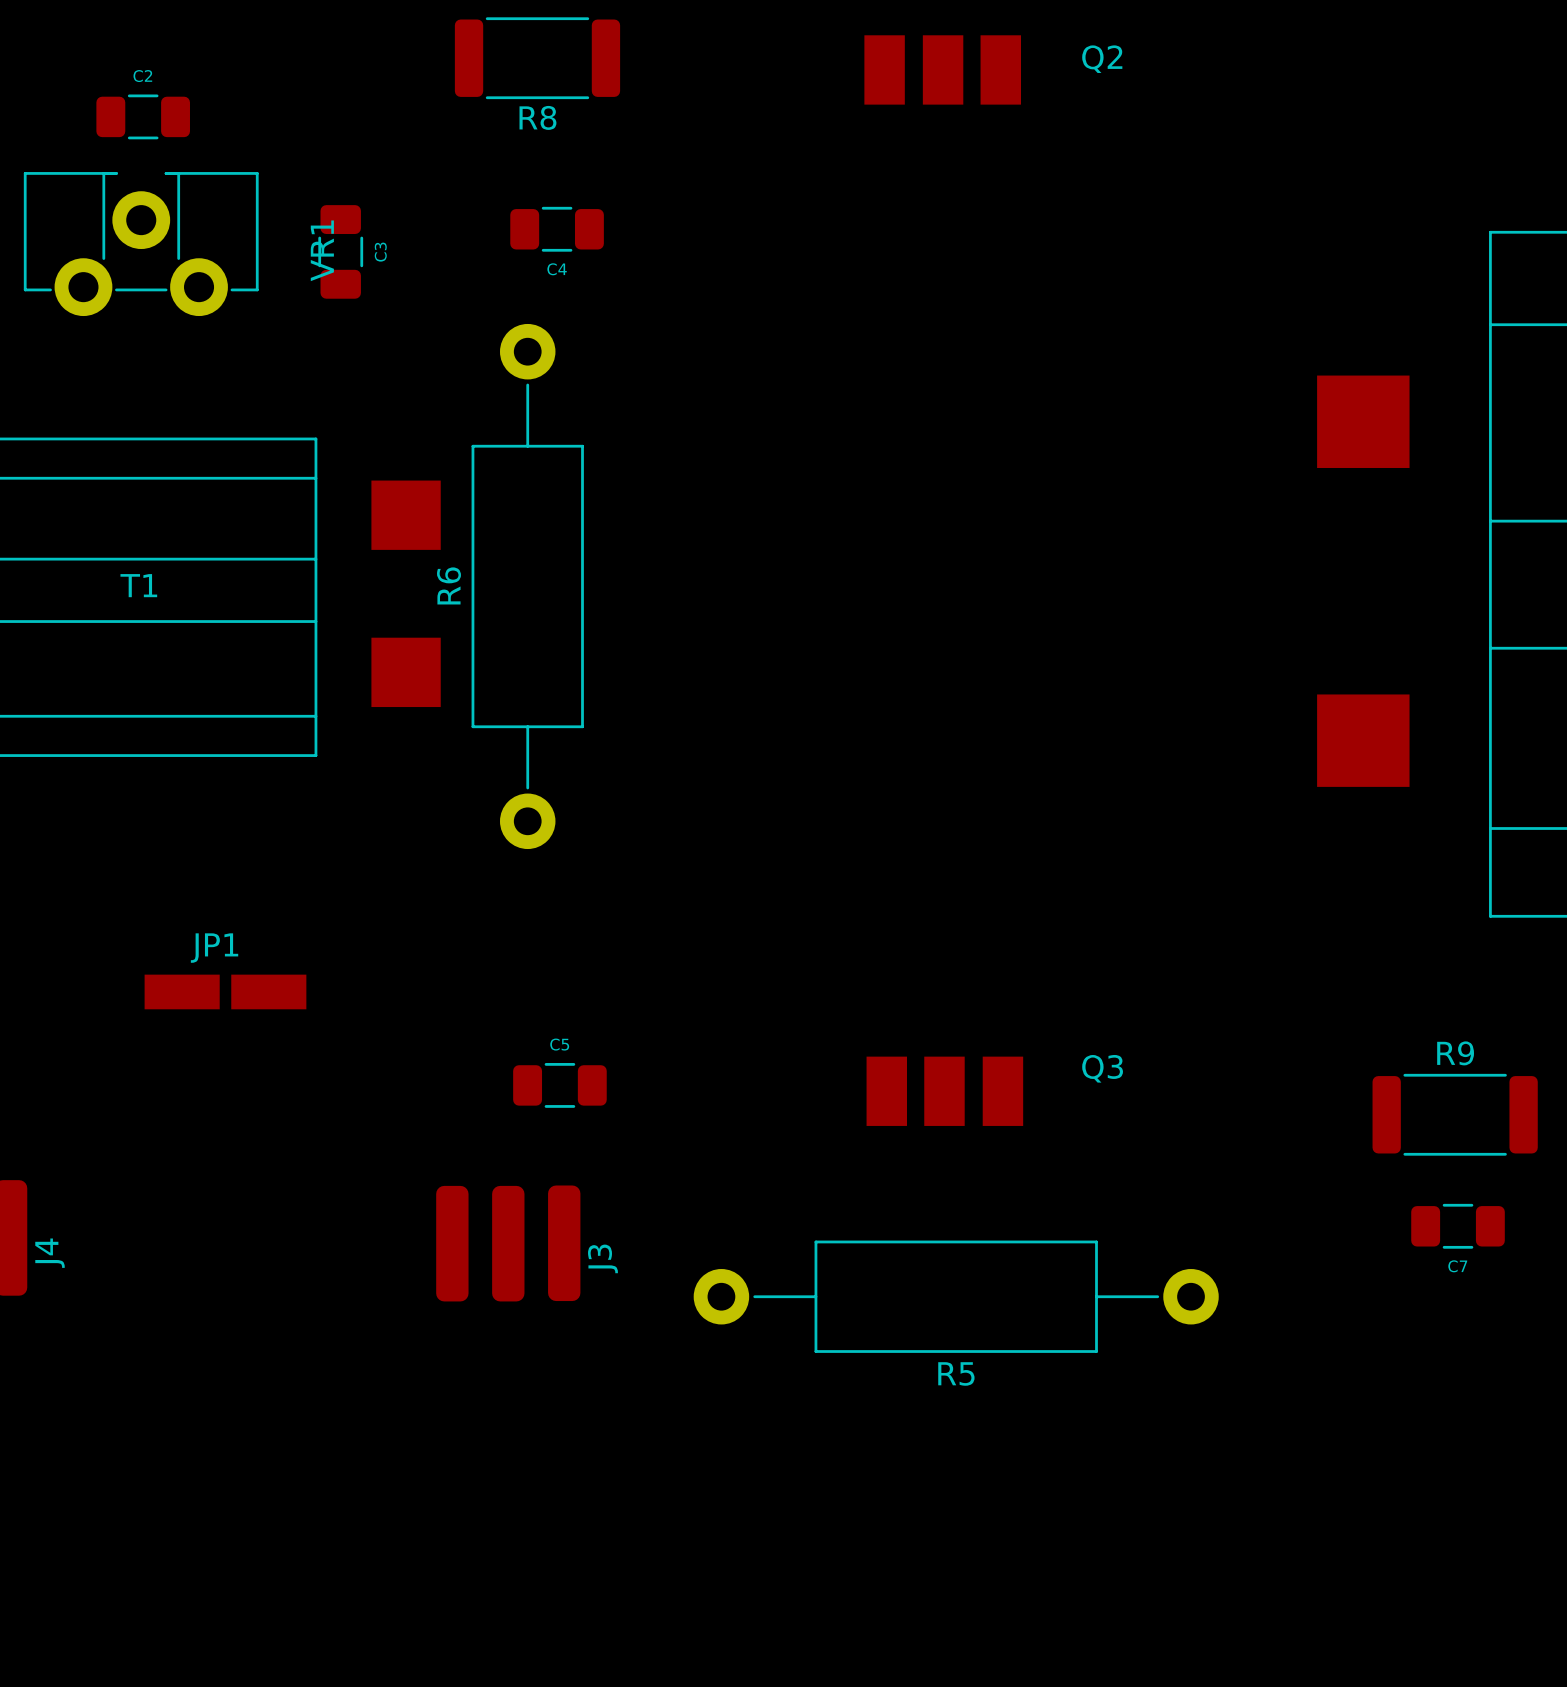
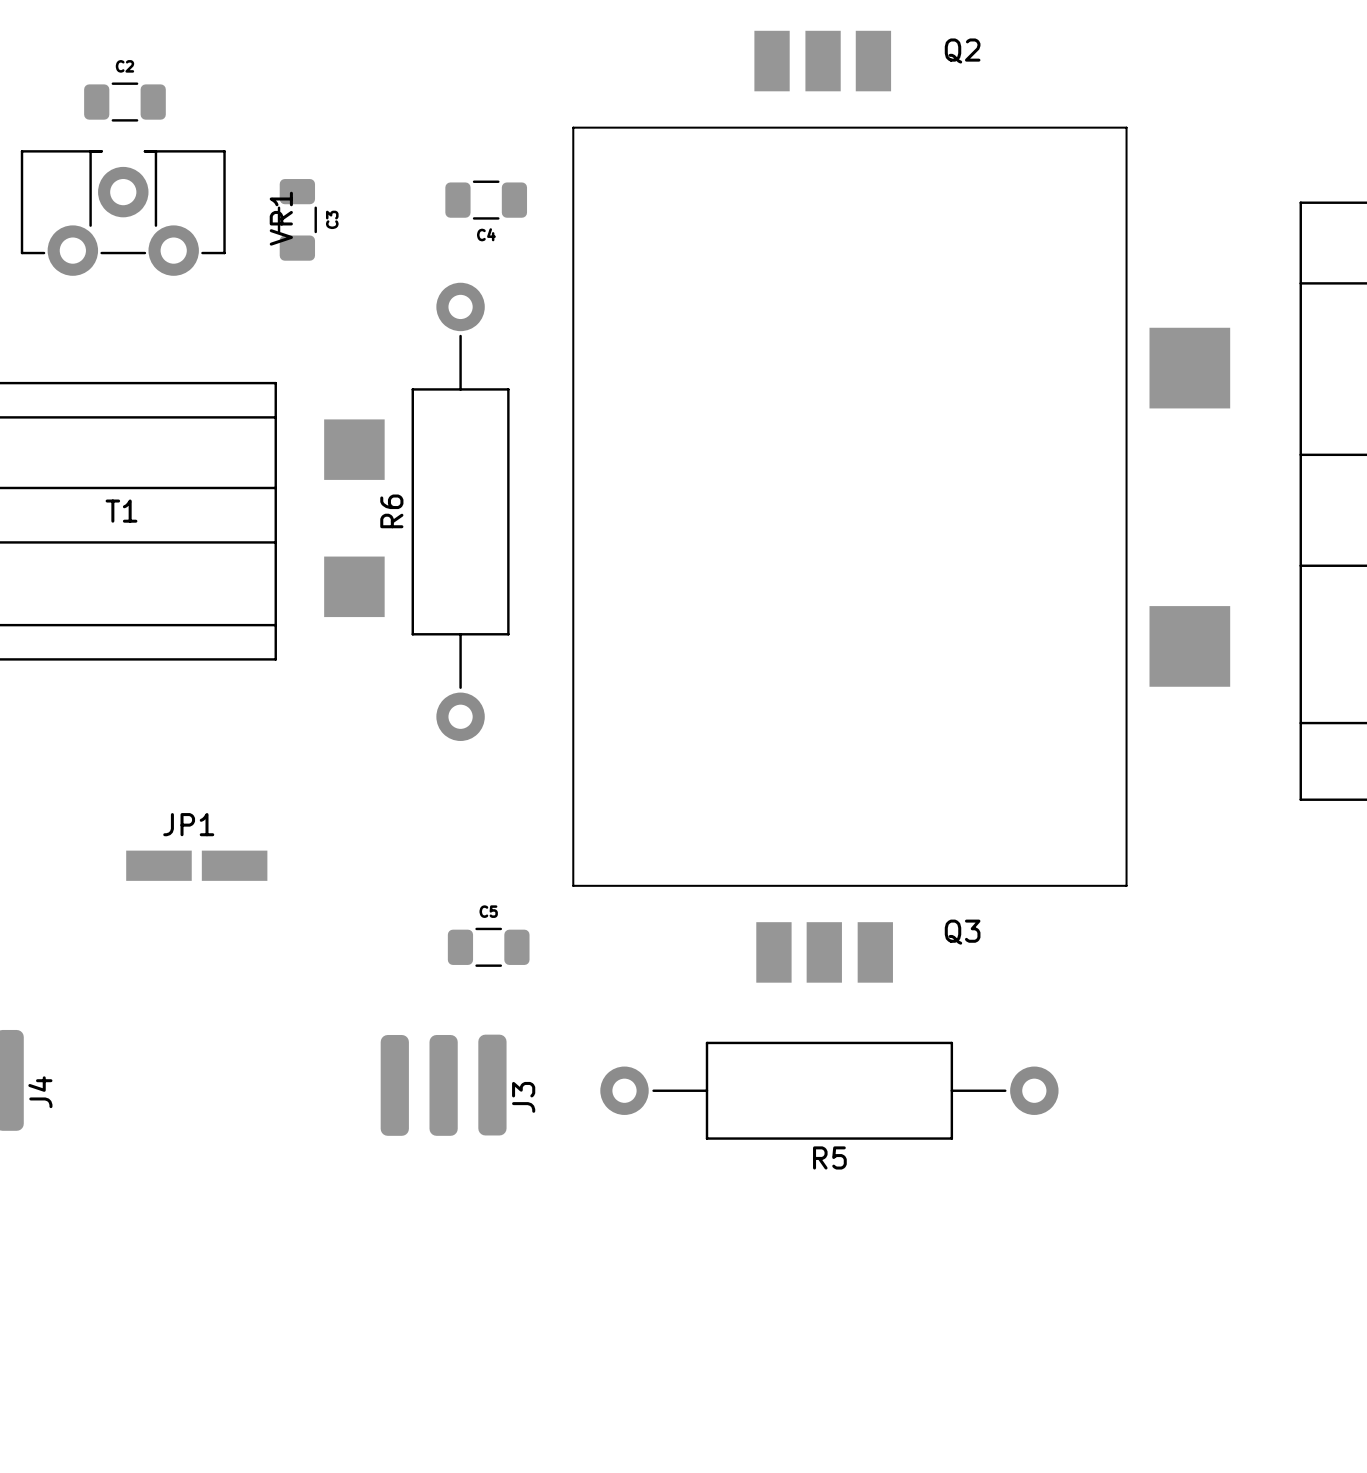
R8: (537, 58) -> none
board edge: none -> (573, 127) (1126, 127) (1126, 885) (573, 885) (573, 127)
R9: (1455, 1114) -> none
C7: (1458, 1226) -> none
R5 position: (956, 1296) -> (829, 1090)

